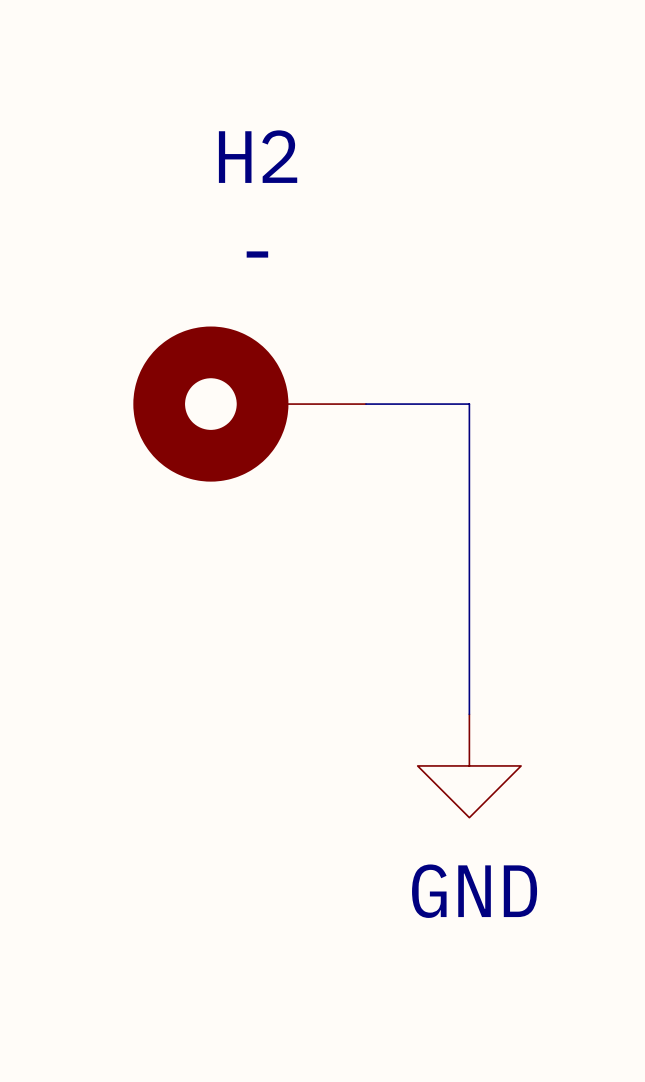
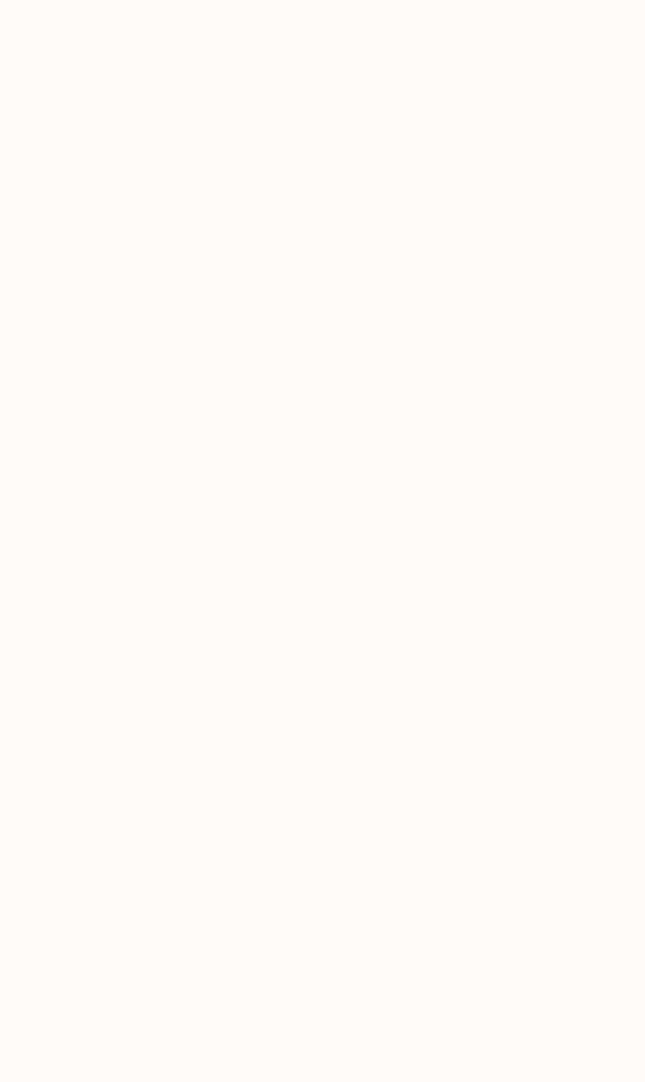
H2: - (249, 404) -> none
wire: (365, 404) (469, 404) (469, 714) -> none
power symbol: GND (469, 765) -> none

